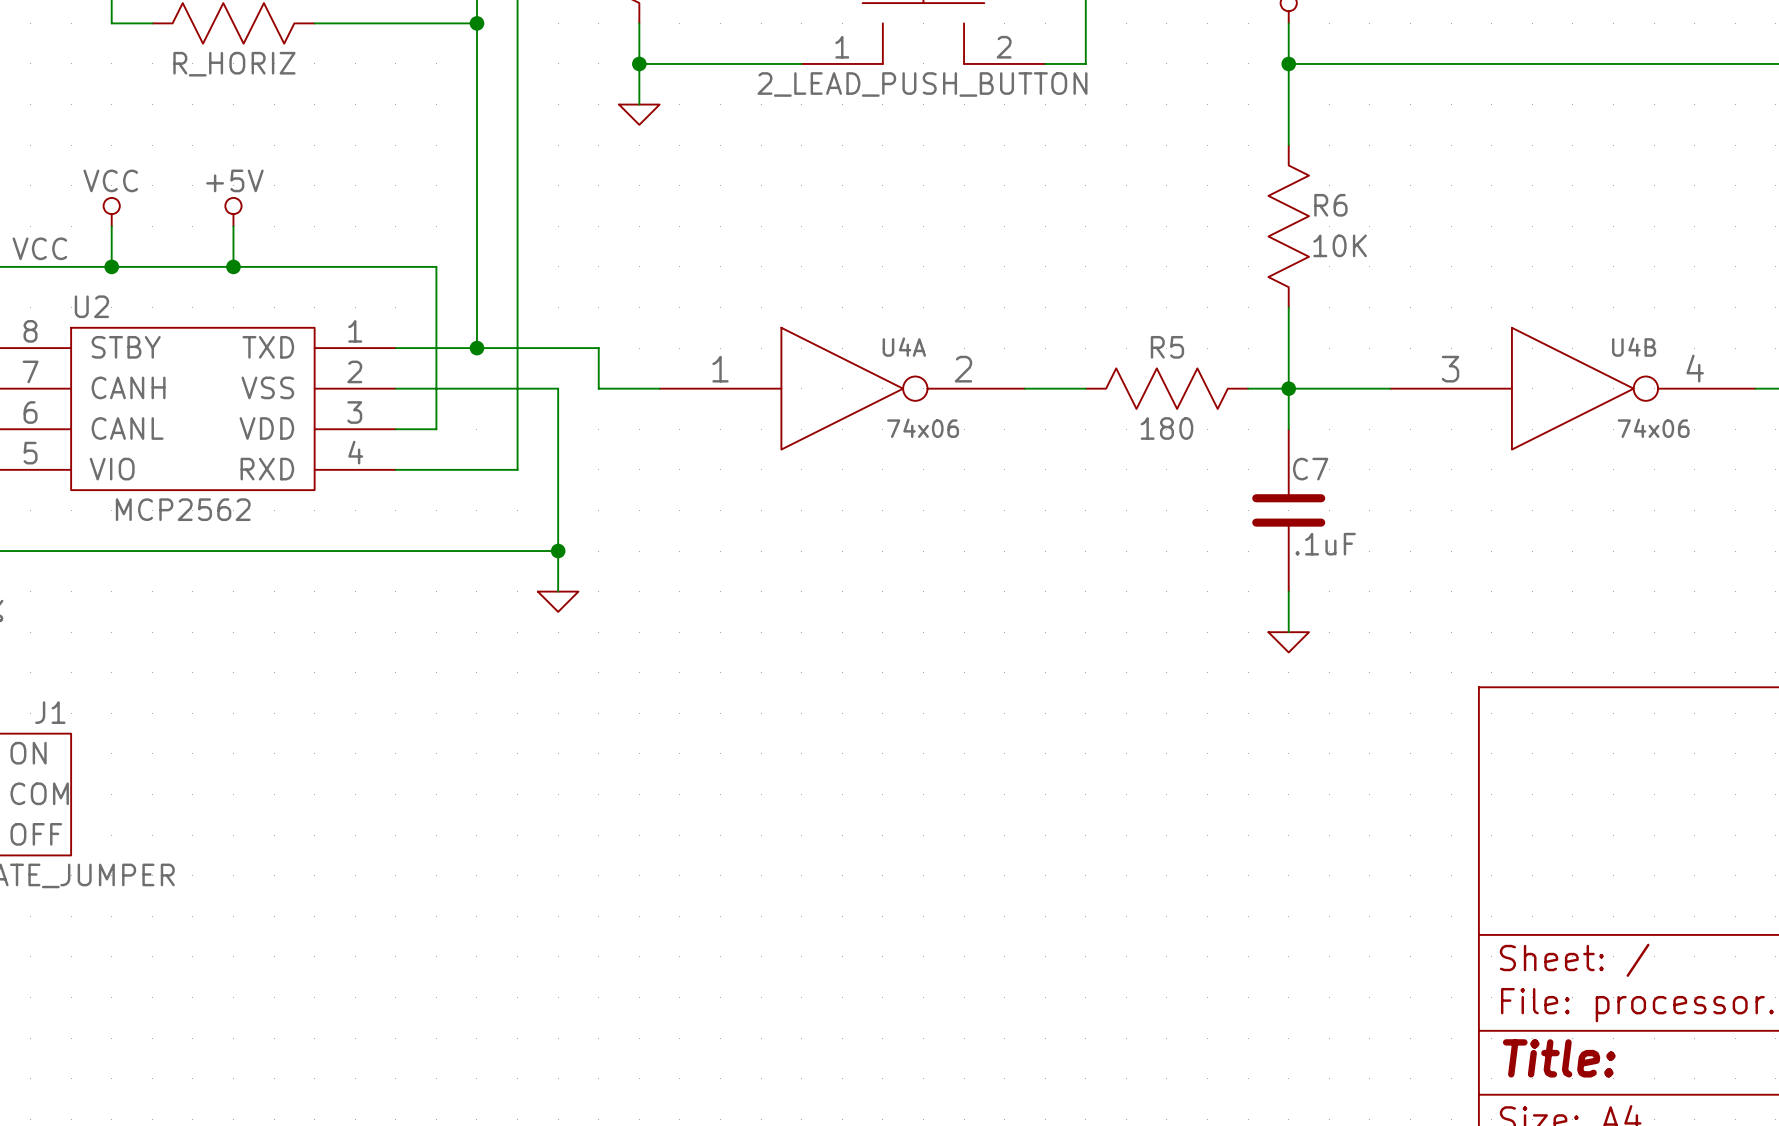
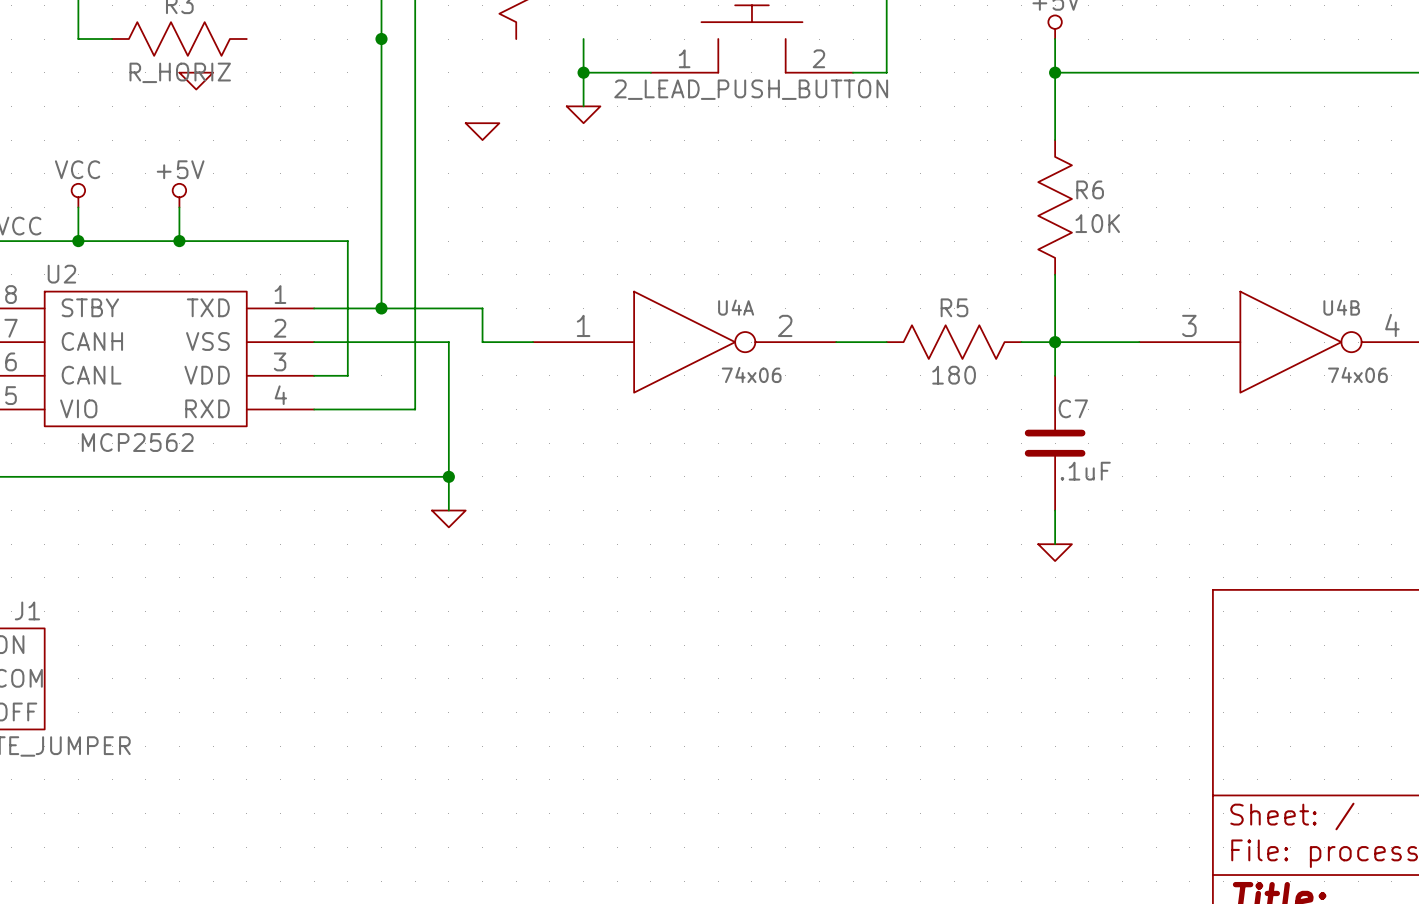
wire: (314, 23) (476, 23) -> none
wire: (639, 23) (639, 104) -> (583, 39) (583, 106)
wire: (639, 63) (720, 63) -> none
junction position: (639, 63) -> (583, 72)
power symbol: none -> (196, 81)
power symbol: (639, 114) -> none
power symbol: none -> (583, 114)
power symbol: none -> (482, 131)

